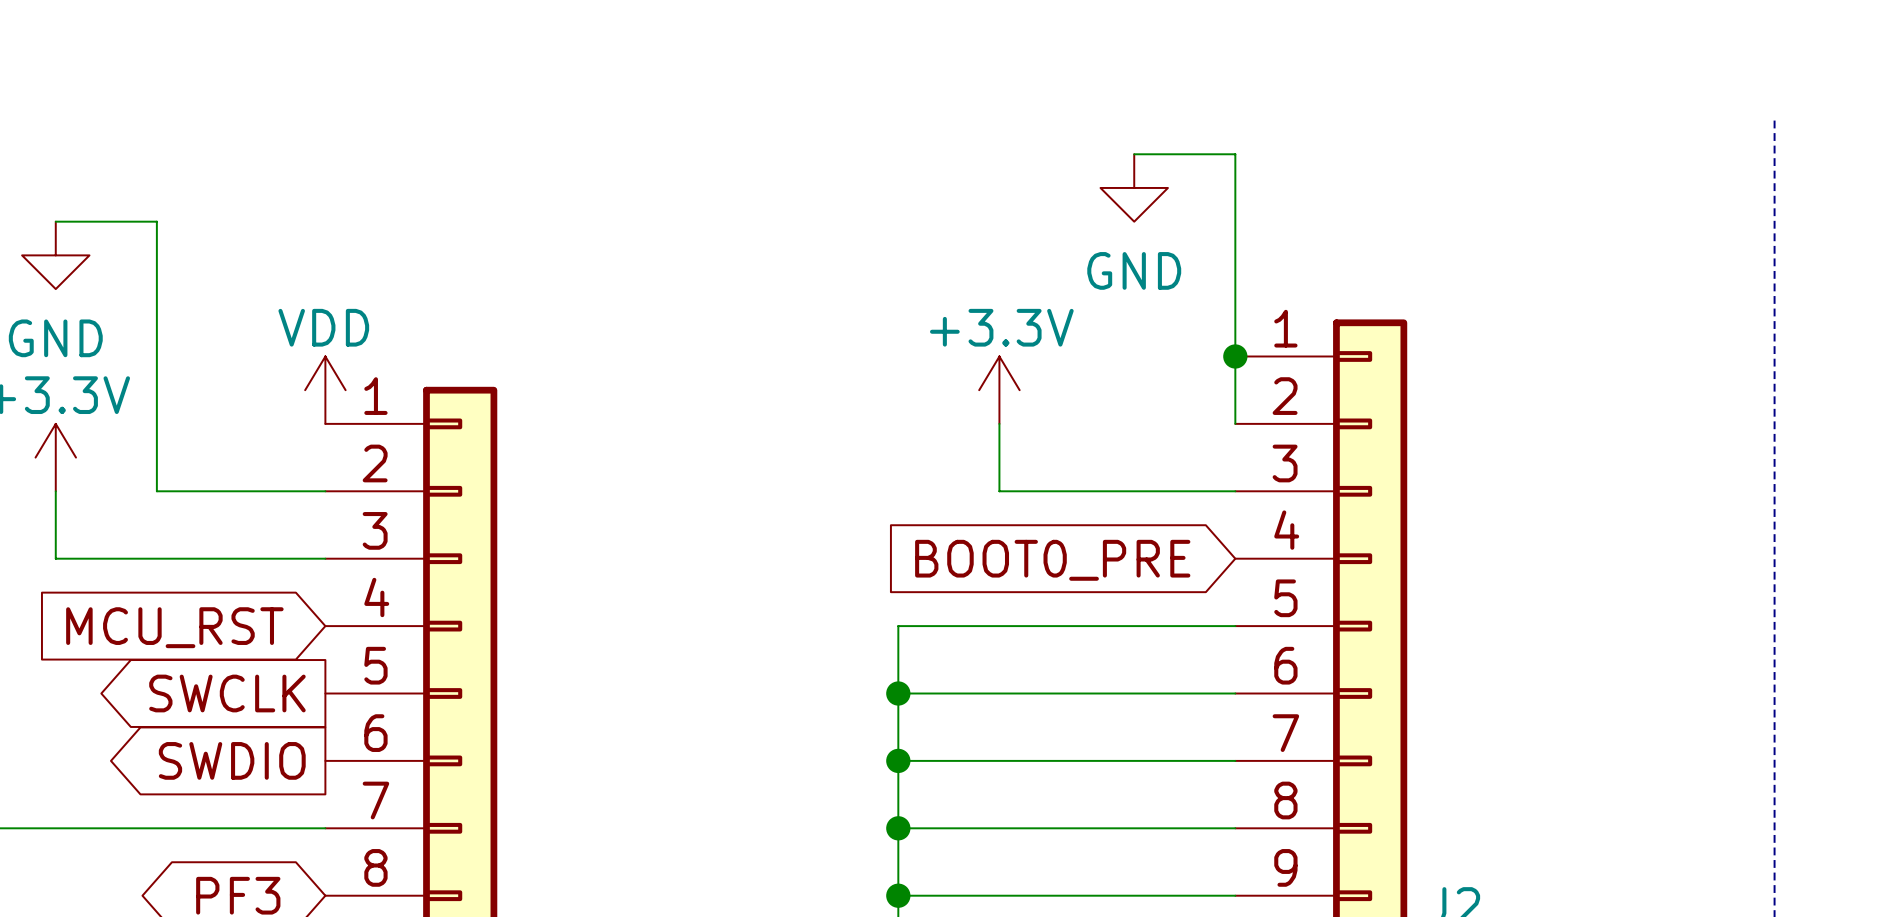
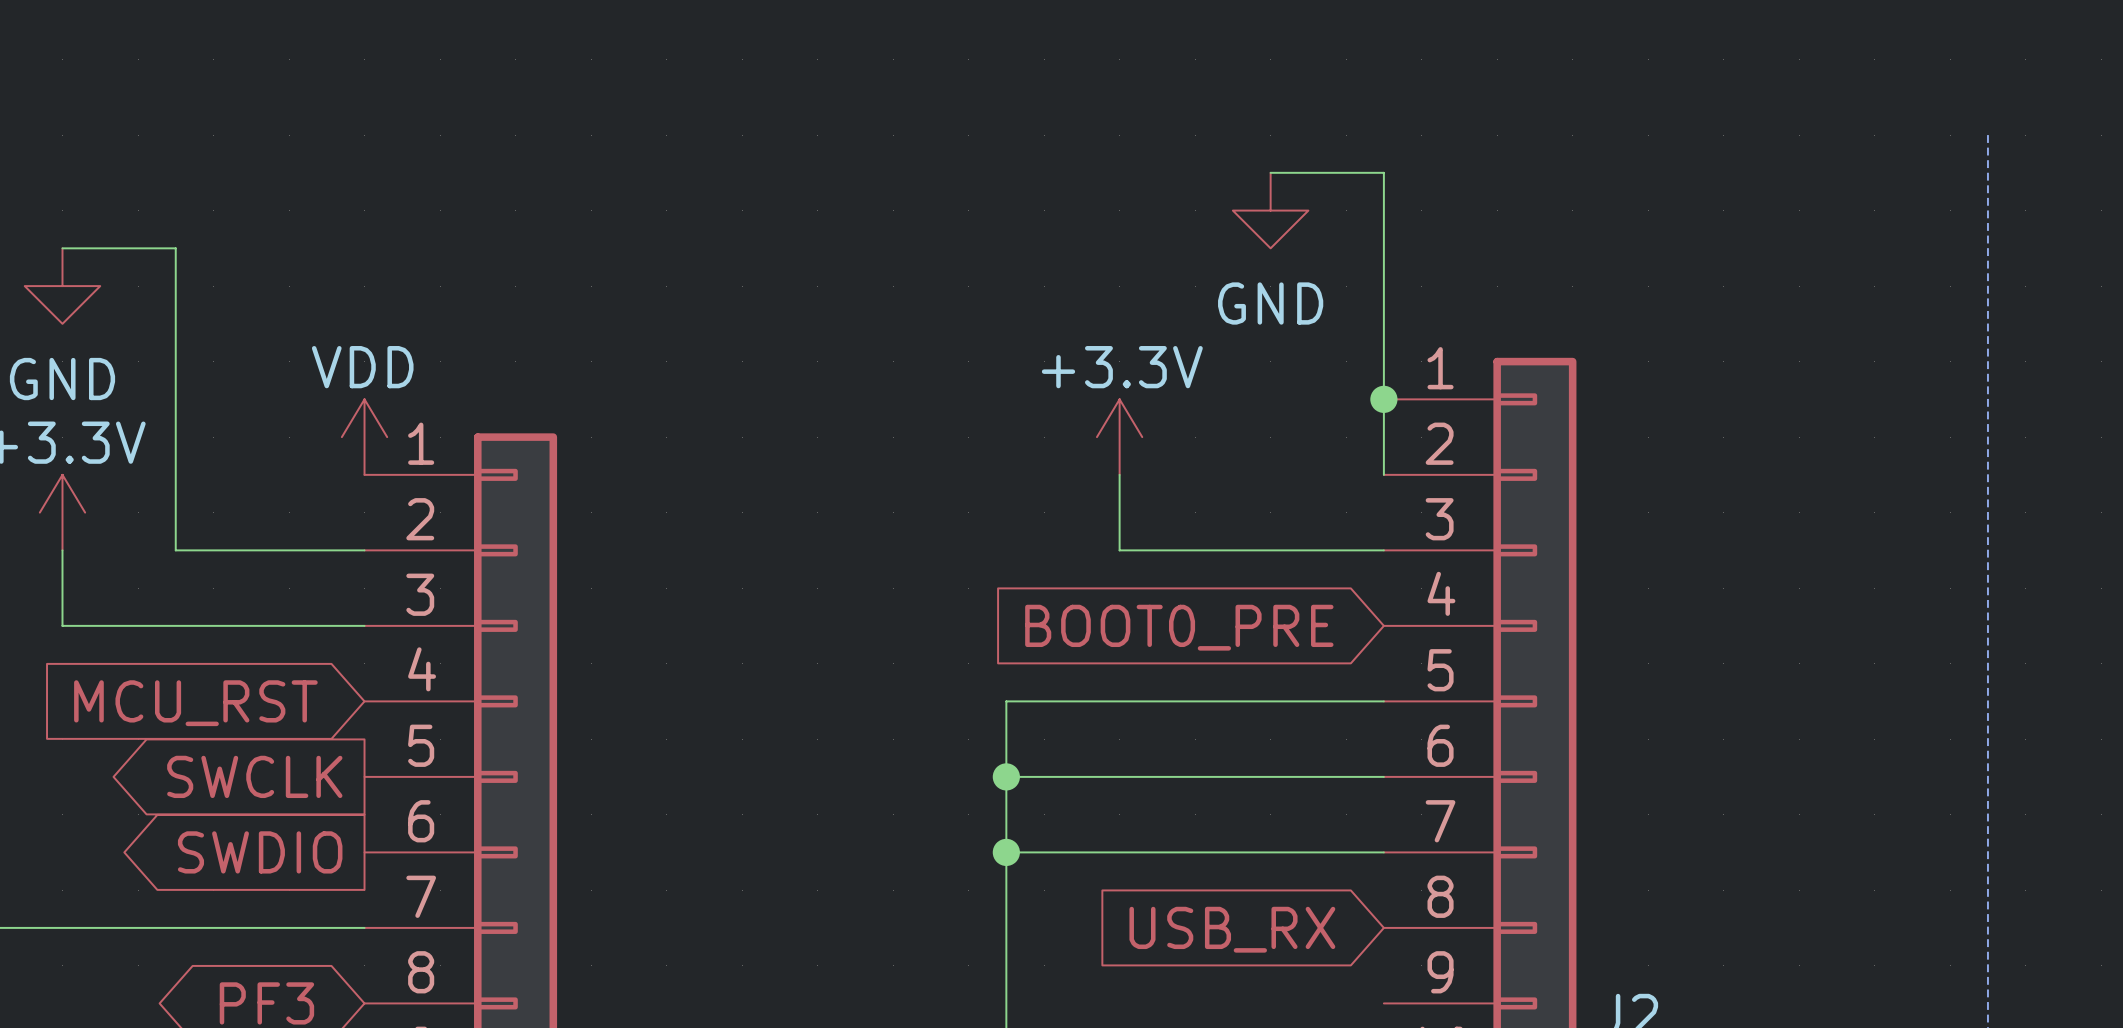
wire: (898, 828) (1235, 828) -> none
junction: (898, 828) -> none
global label: none -> USB_RX (1232, 929)
wire: (898, 895) (1235, 895) -> none
junction: (898, 895) -> none

